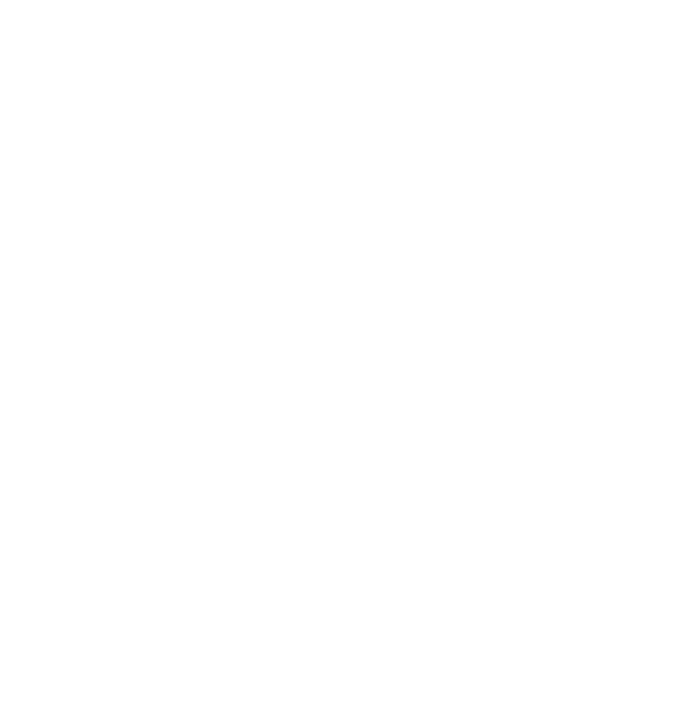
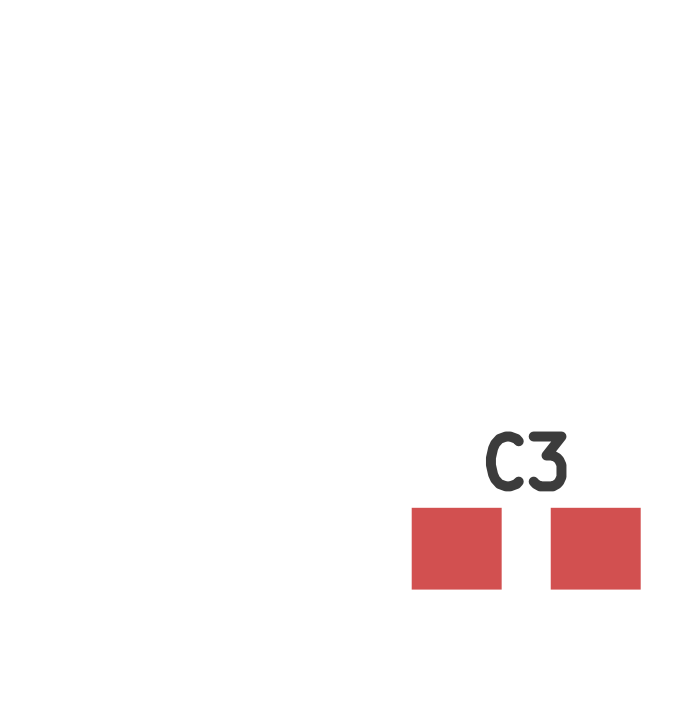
C3: none -> (526, 548)

